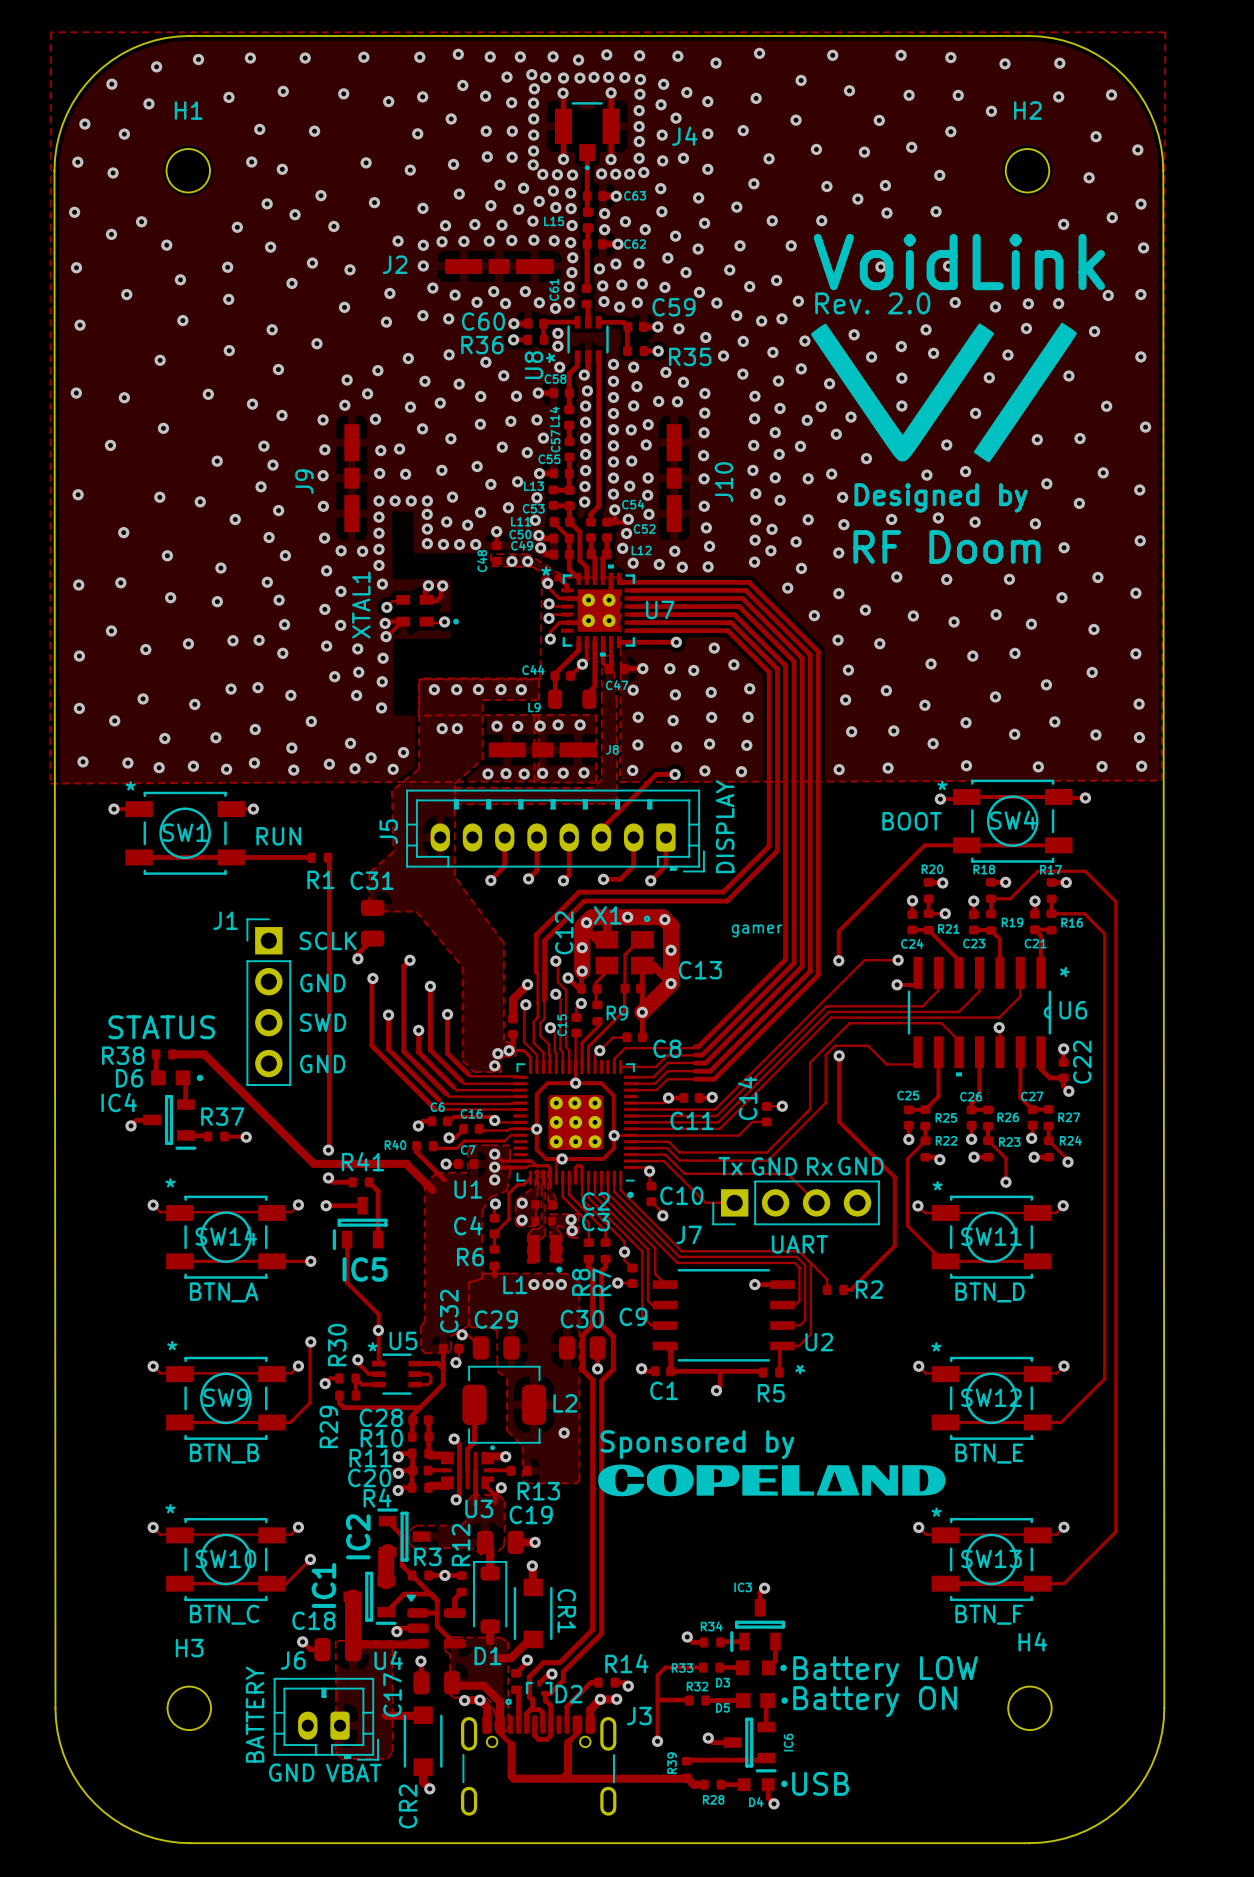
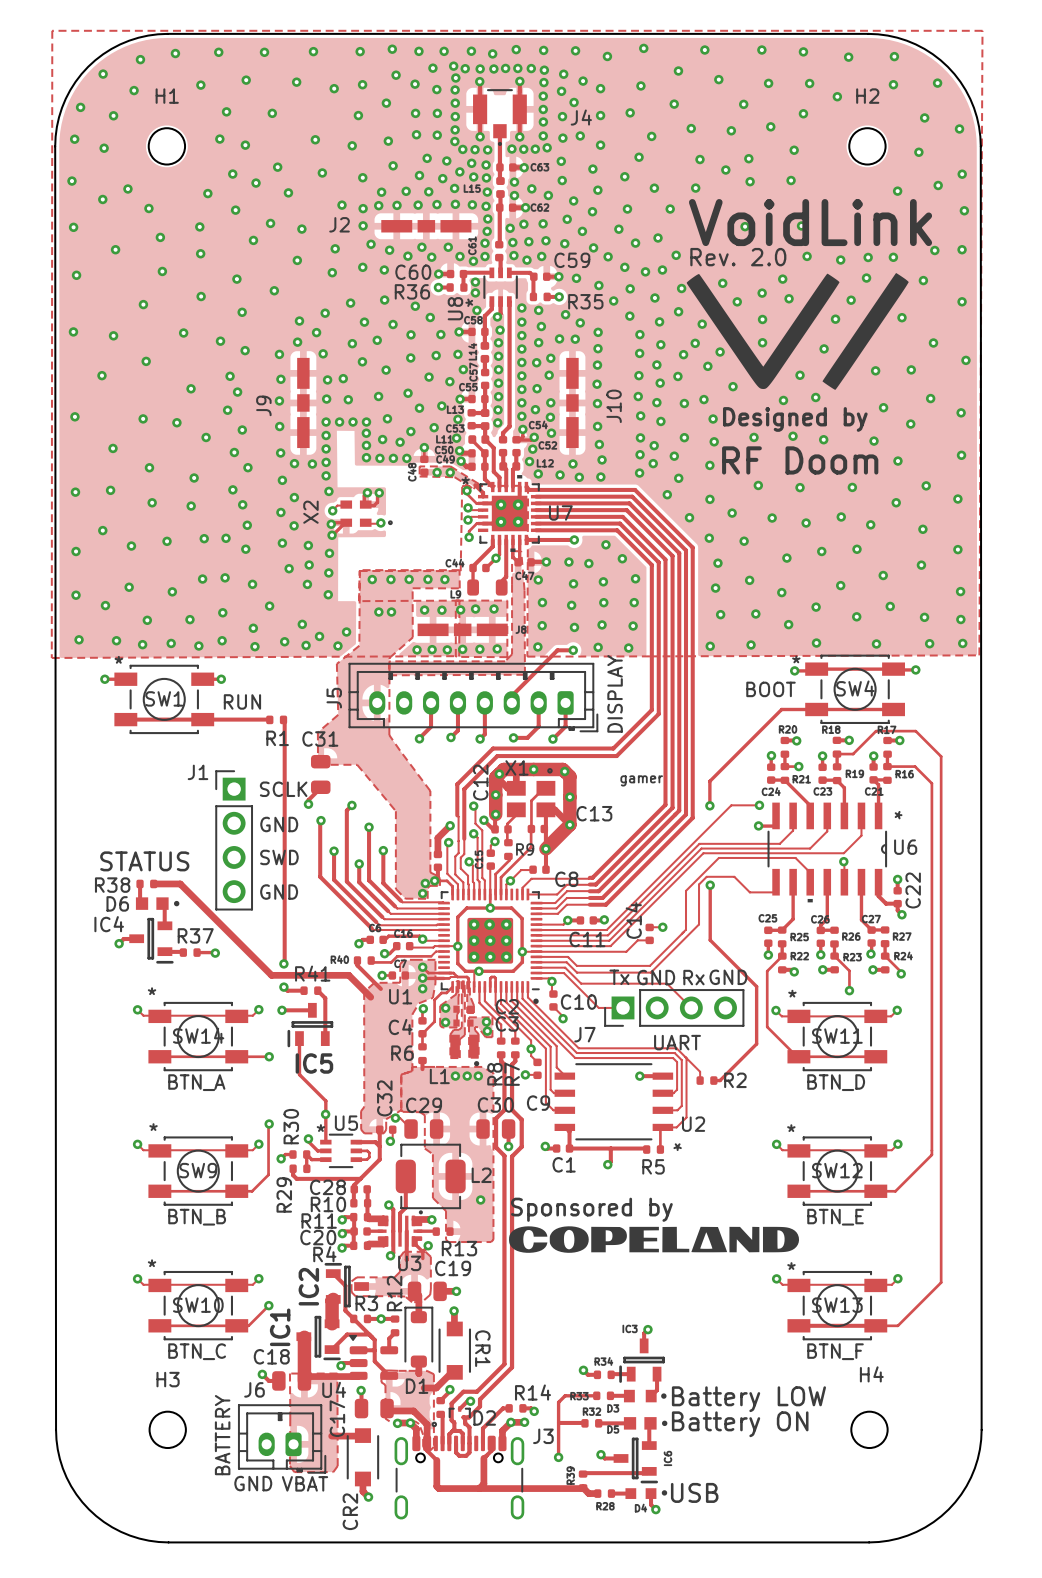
XTAL1 name: XTAL1 (361, 605) -> X2 (310, 512)

